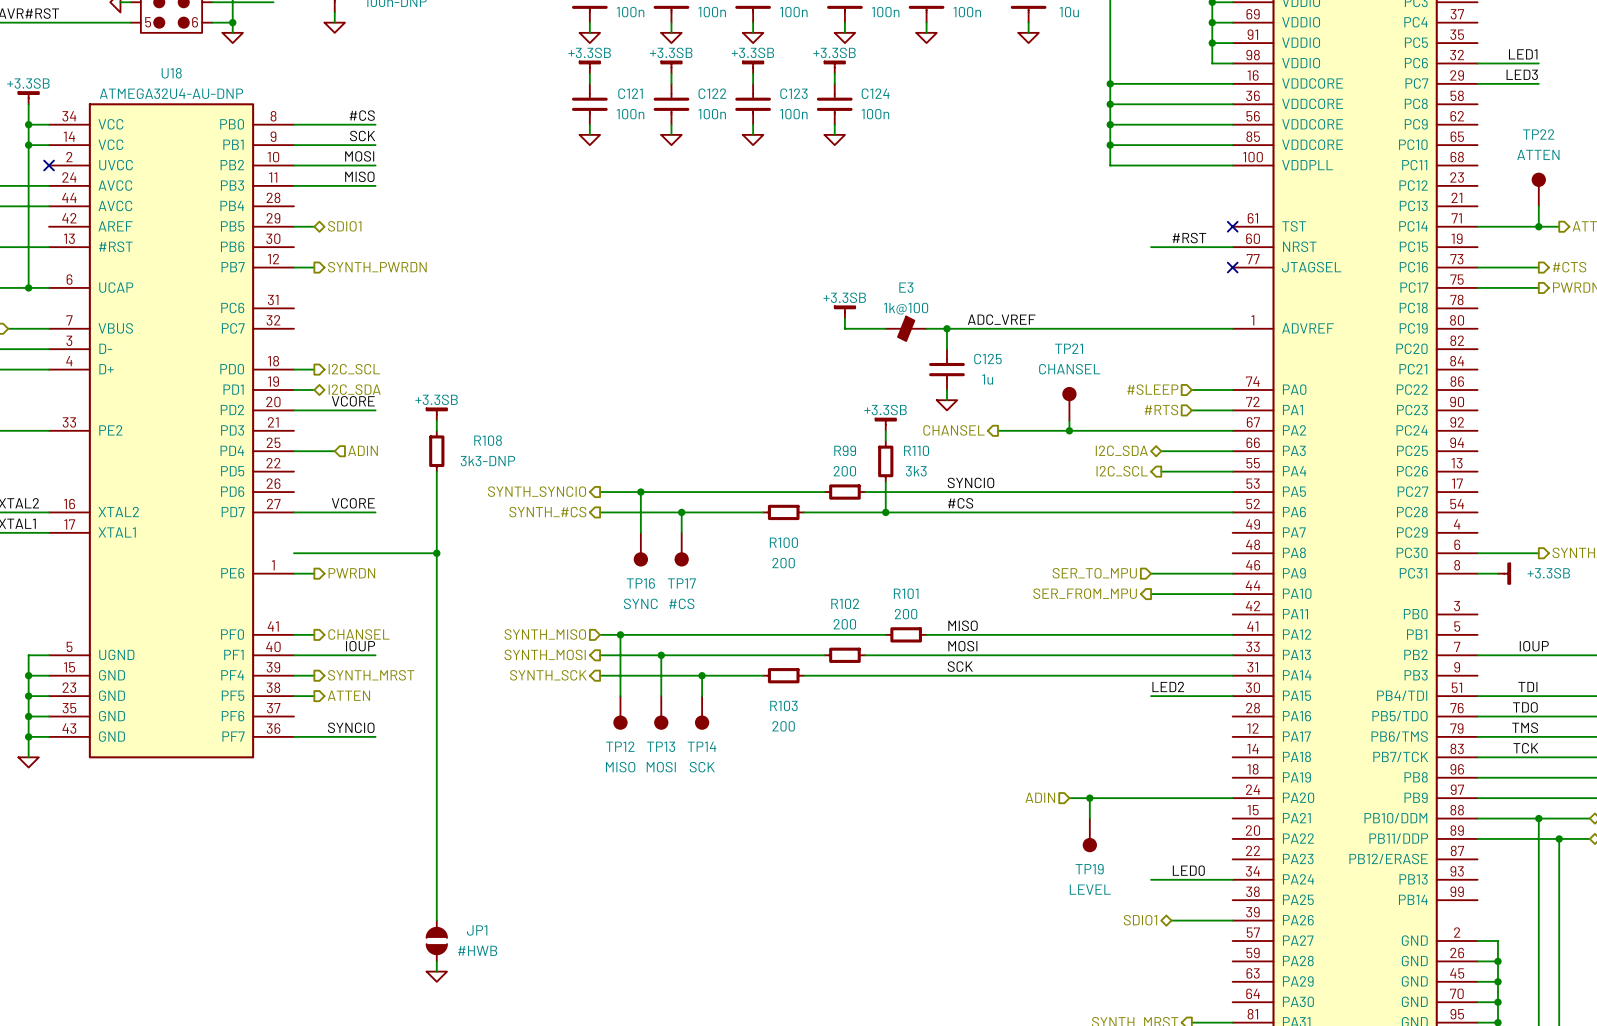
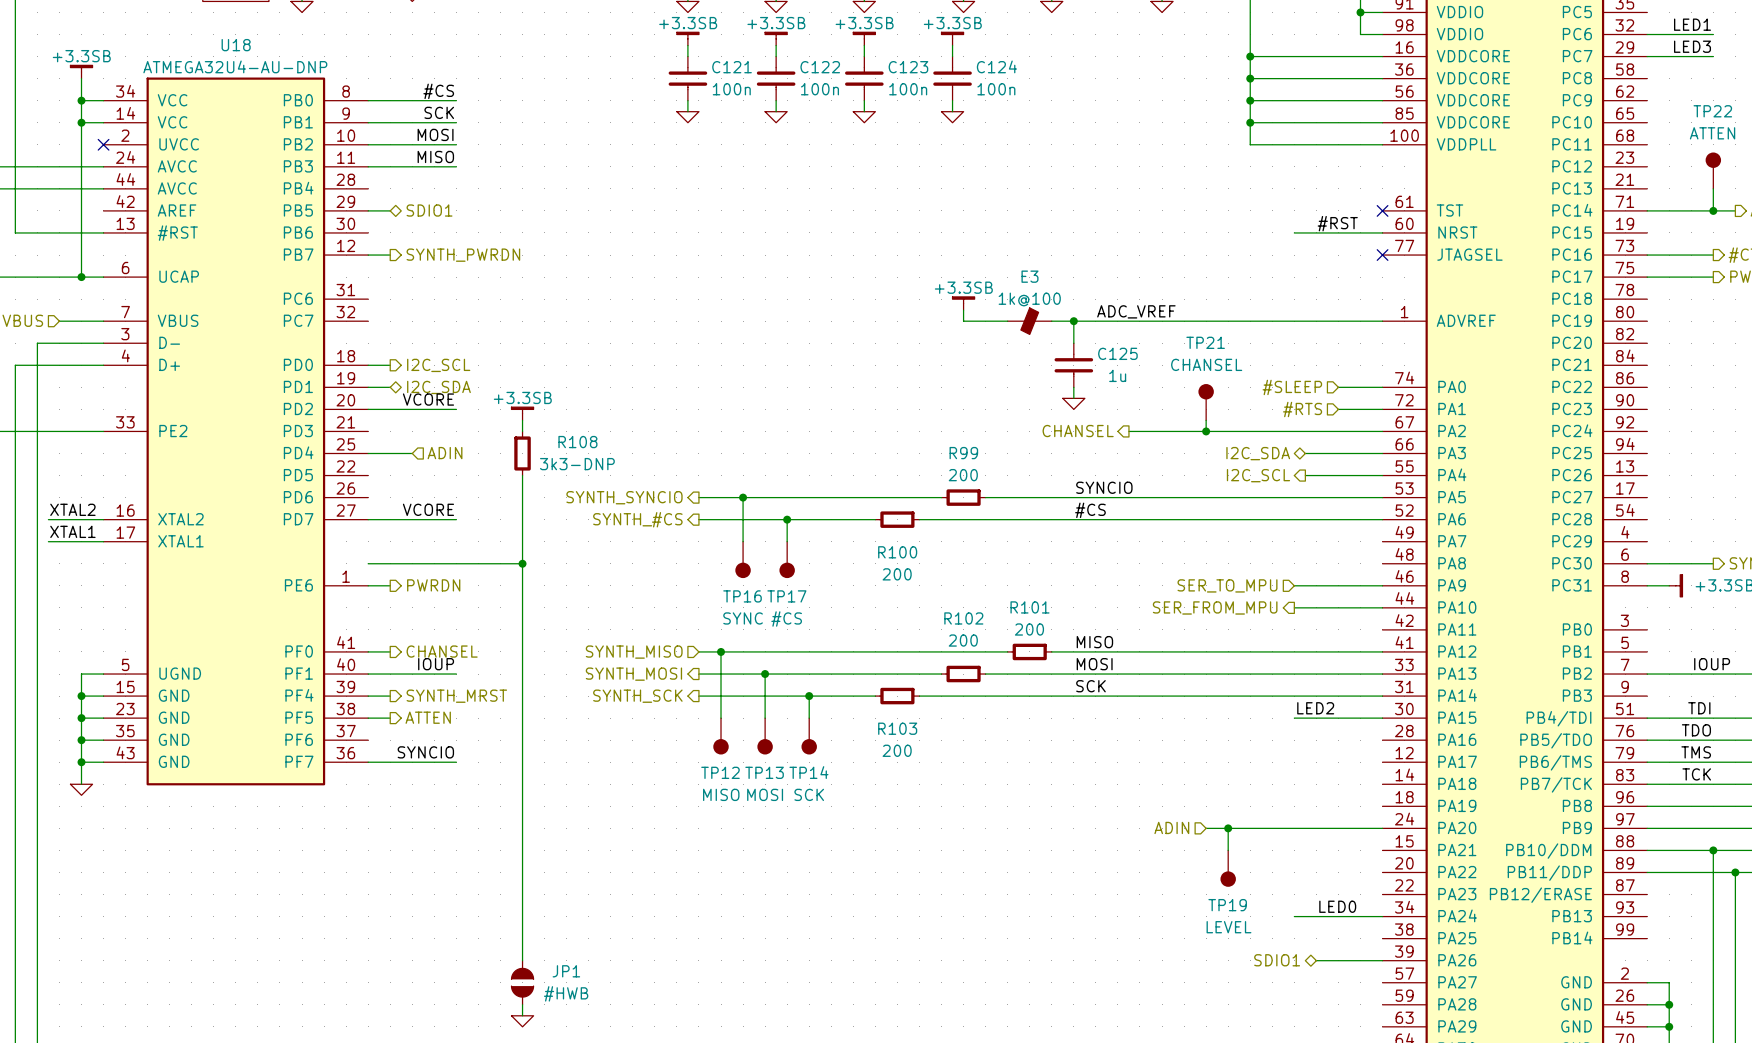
power symbol: +3.3SB (885, 424) -> none
wire: (885, 430) (885, 441) -> none
R110: 3k3 (885, 461) -> none
wire: (885, 481) (885, 512) -> none
junction: (885, 512) -> none

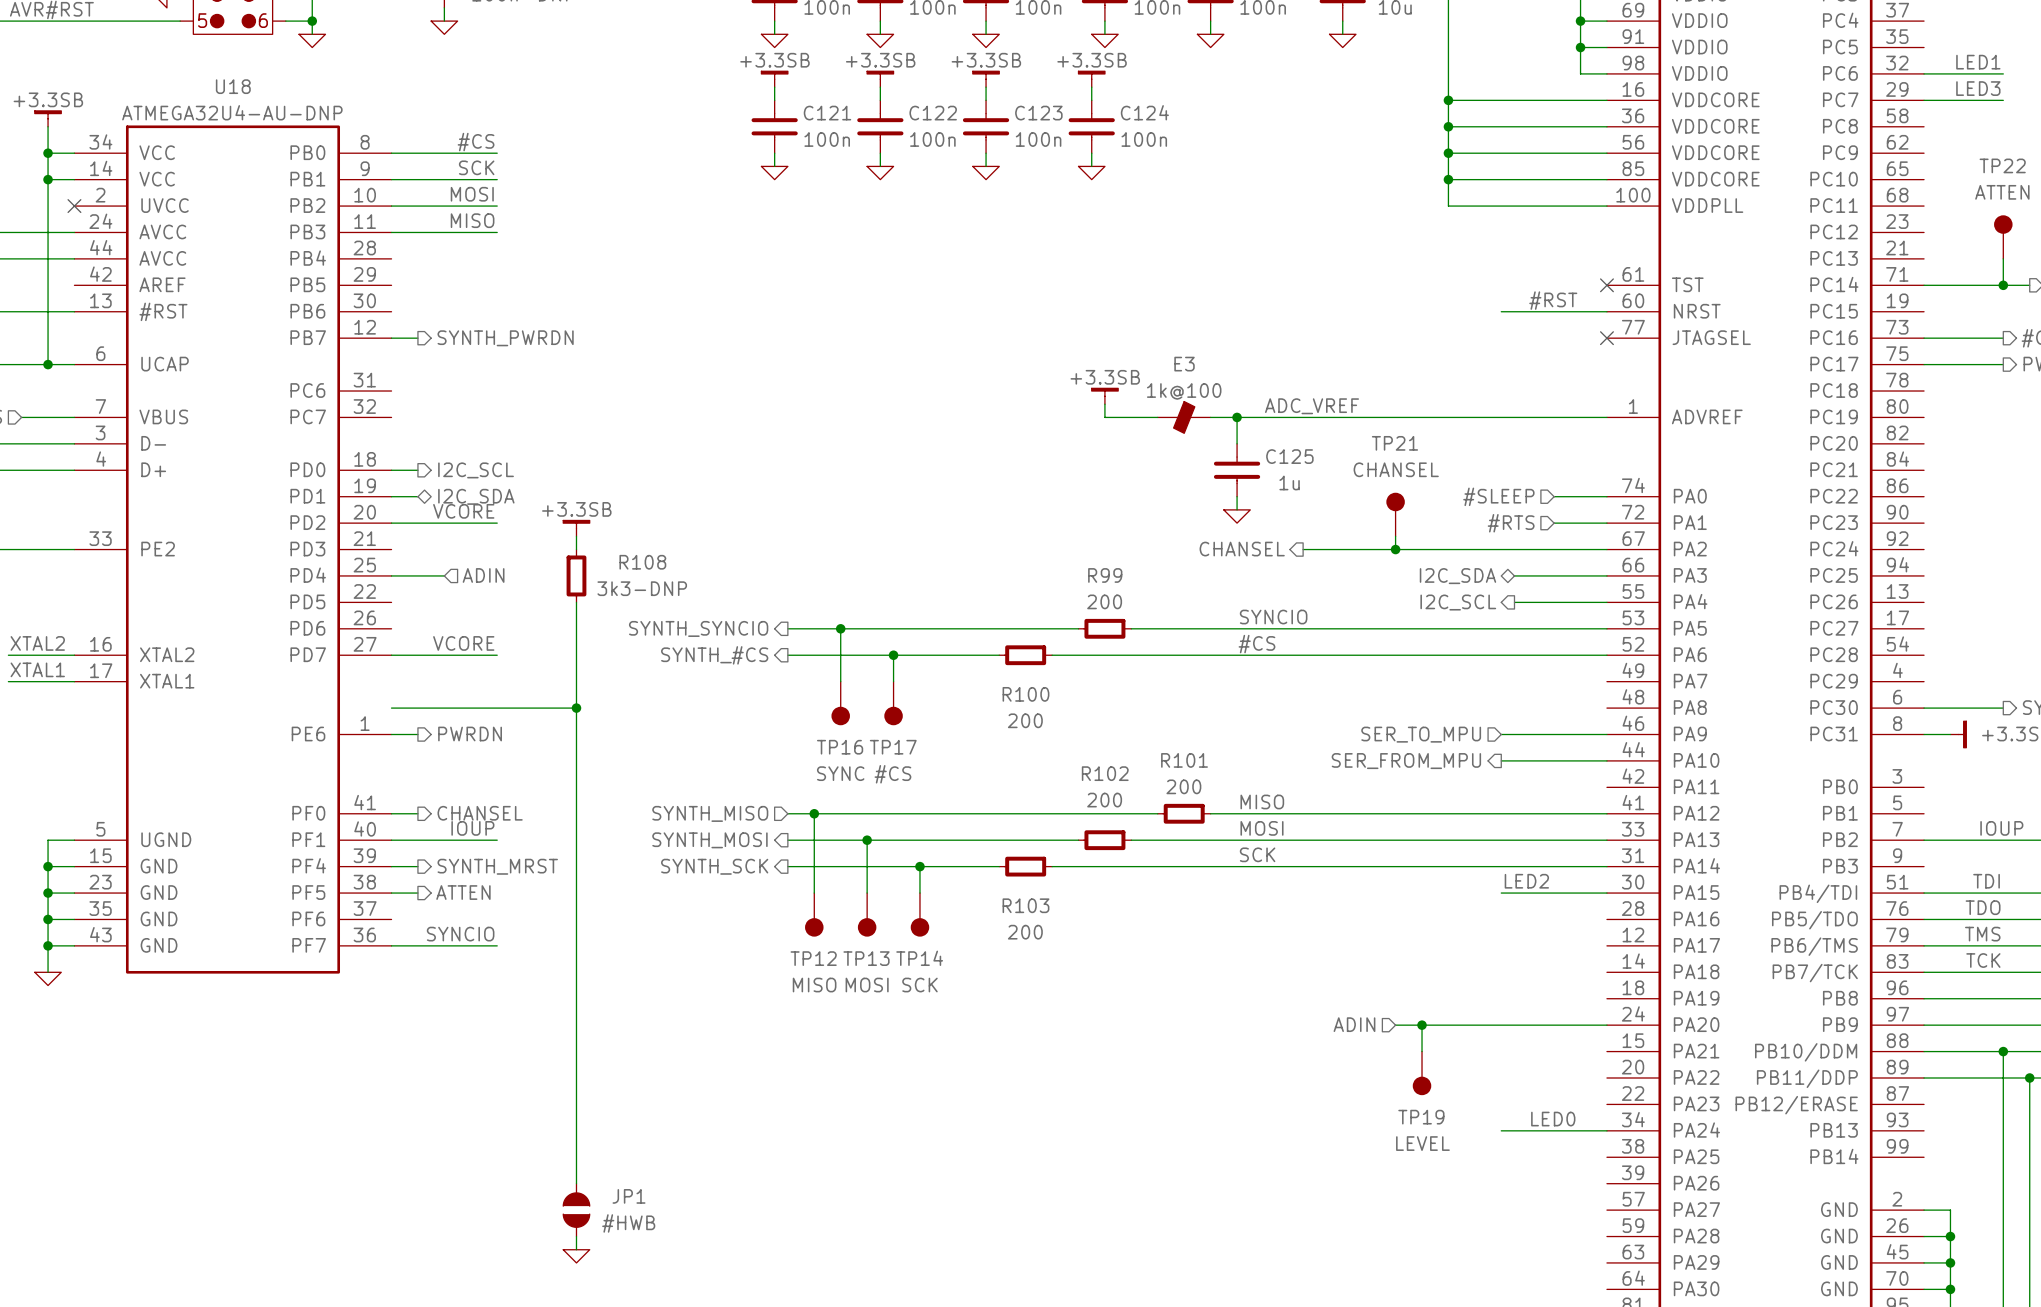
wire: (368, 210) (390, 210) -> none
hierarchical label: SDIO1 (429, 210) -> none
hierarchical label: SDIO1 (1277, 960) -> none
wire: (1316, 960) (1382, 960) -> none

